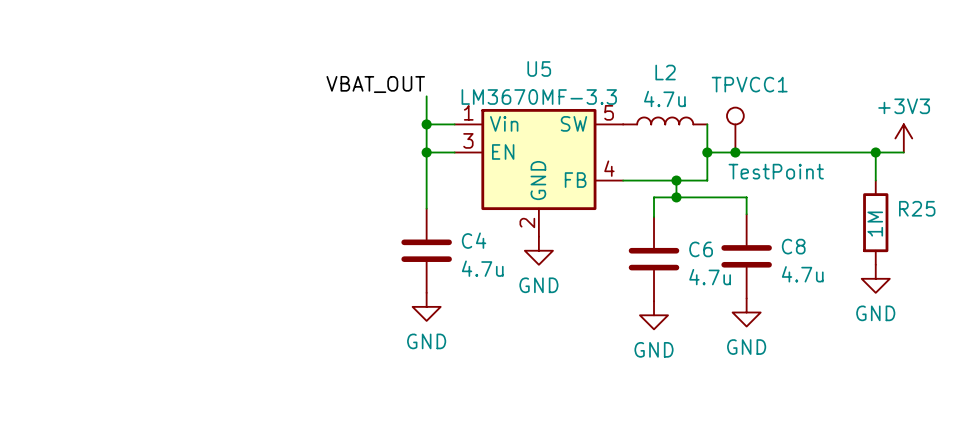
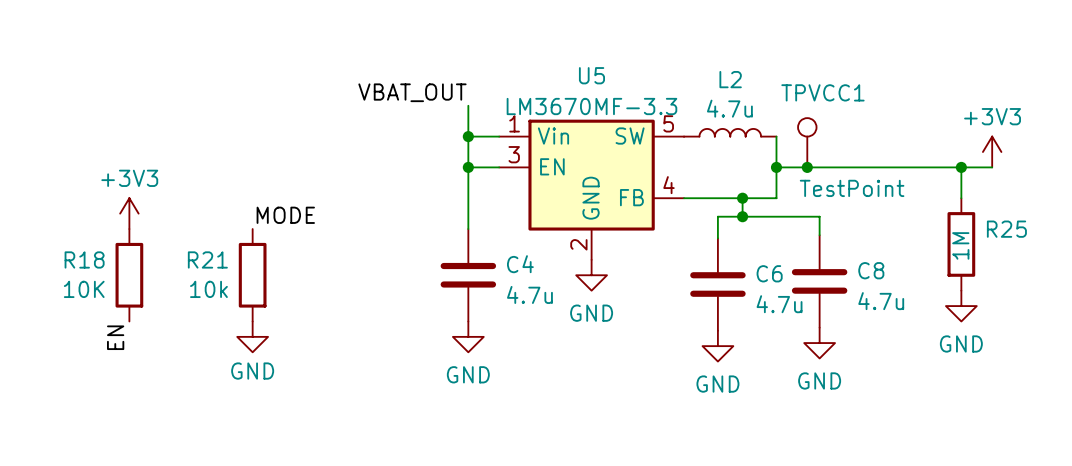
power symbol: none -> +3V3 (129, 213)
label: none -> MODE (285, 215)
R18: none -> 10K (129, 275)
R21: none -> 10k (252, 275)
power symbol: none -> GND (252, 336)
label: none -> EN (115, 337)

